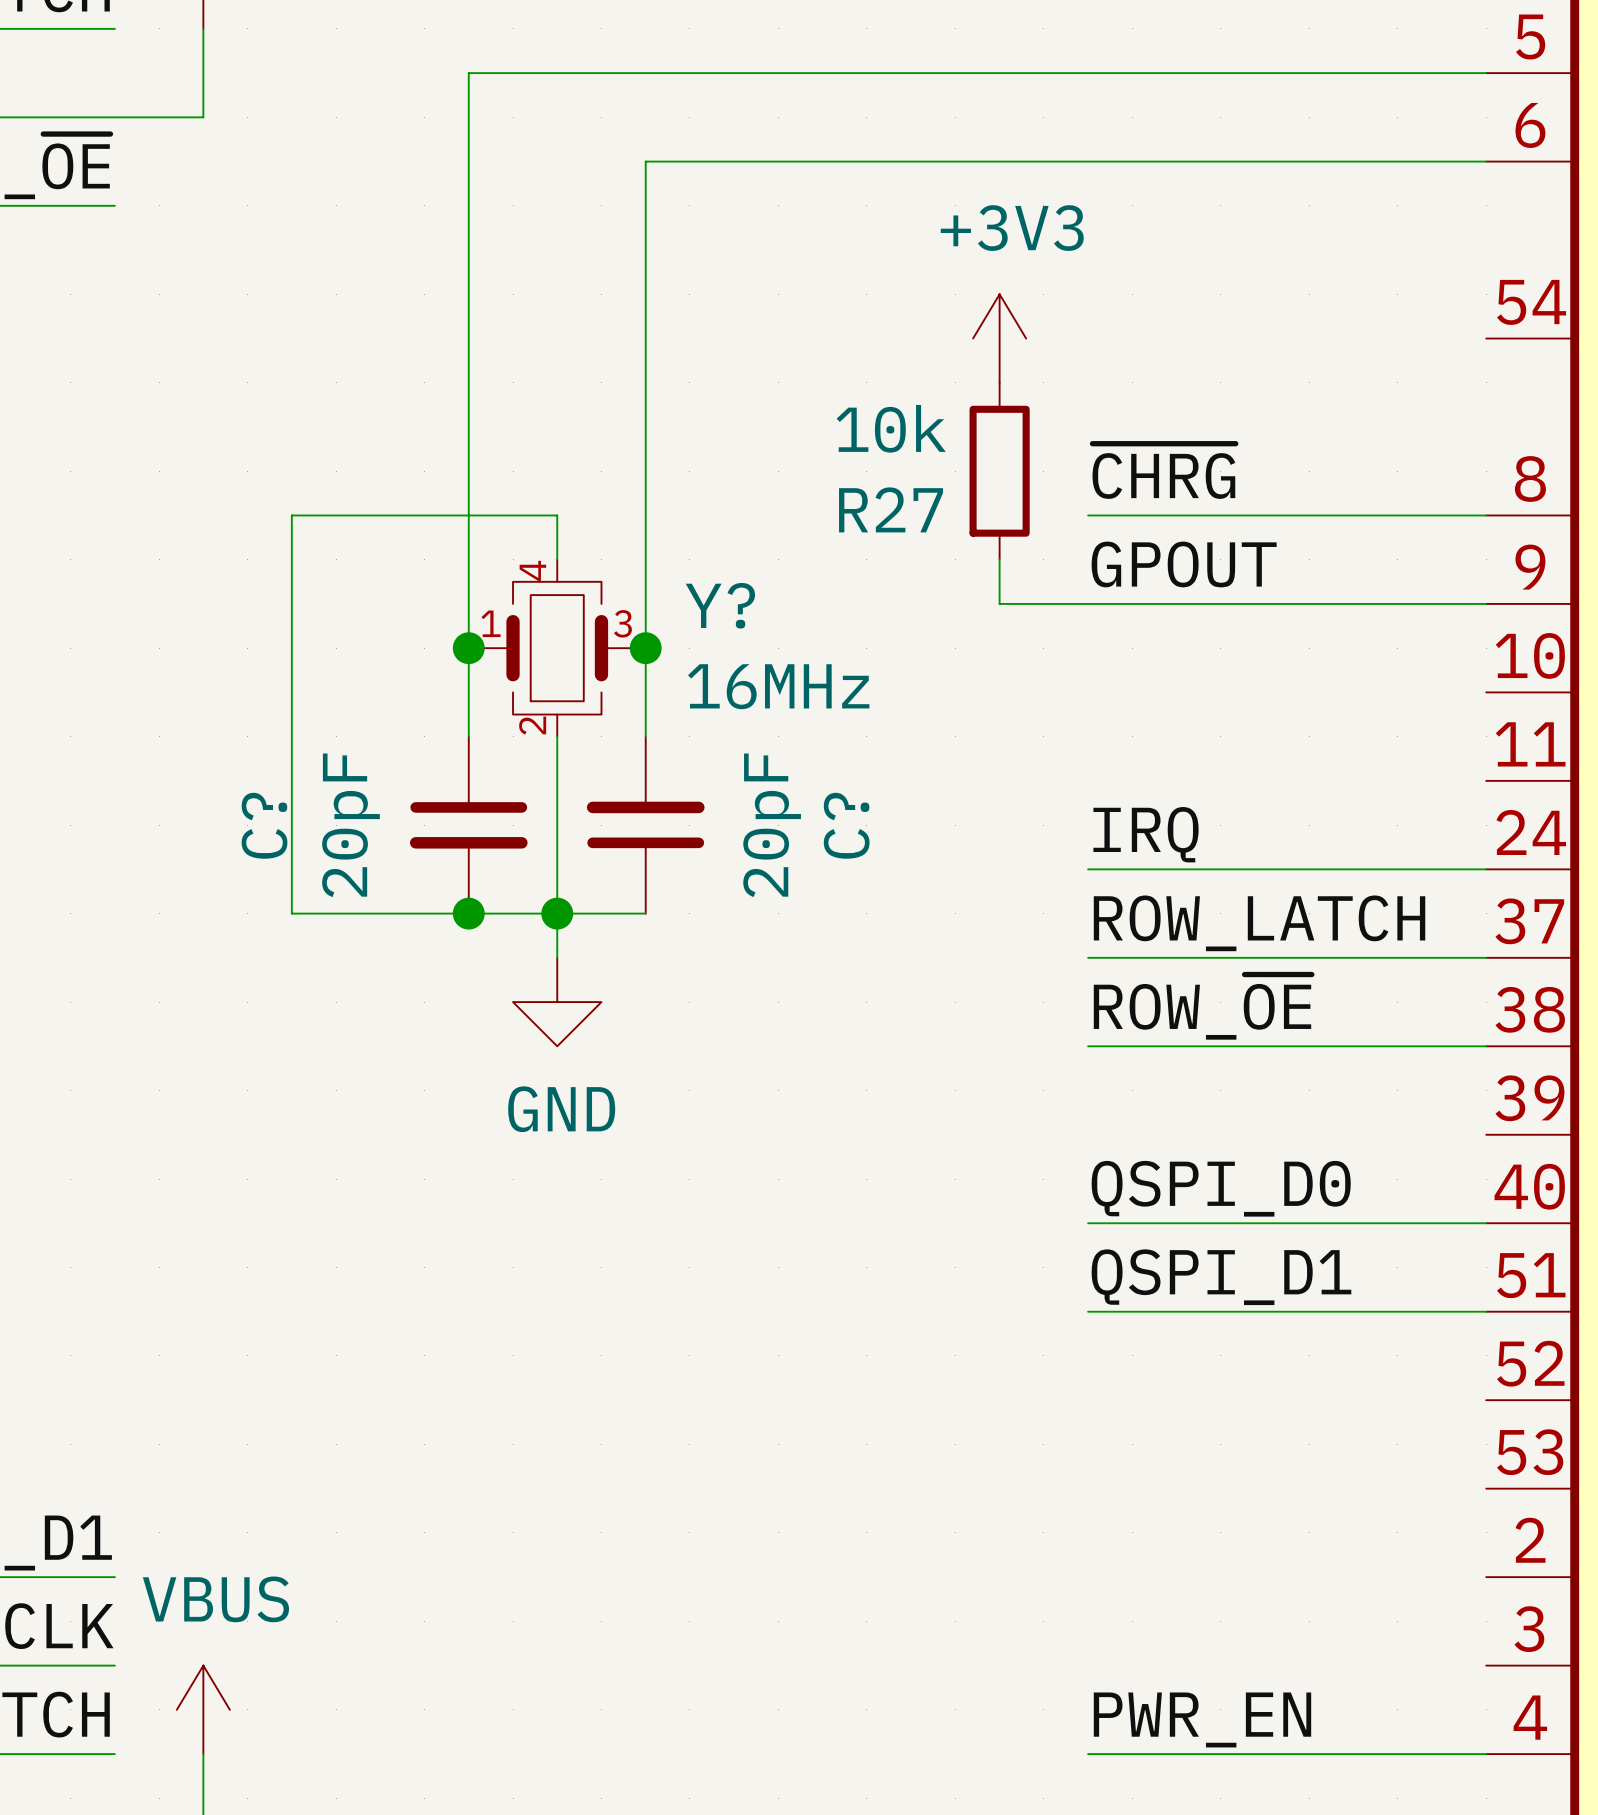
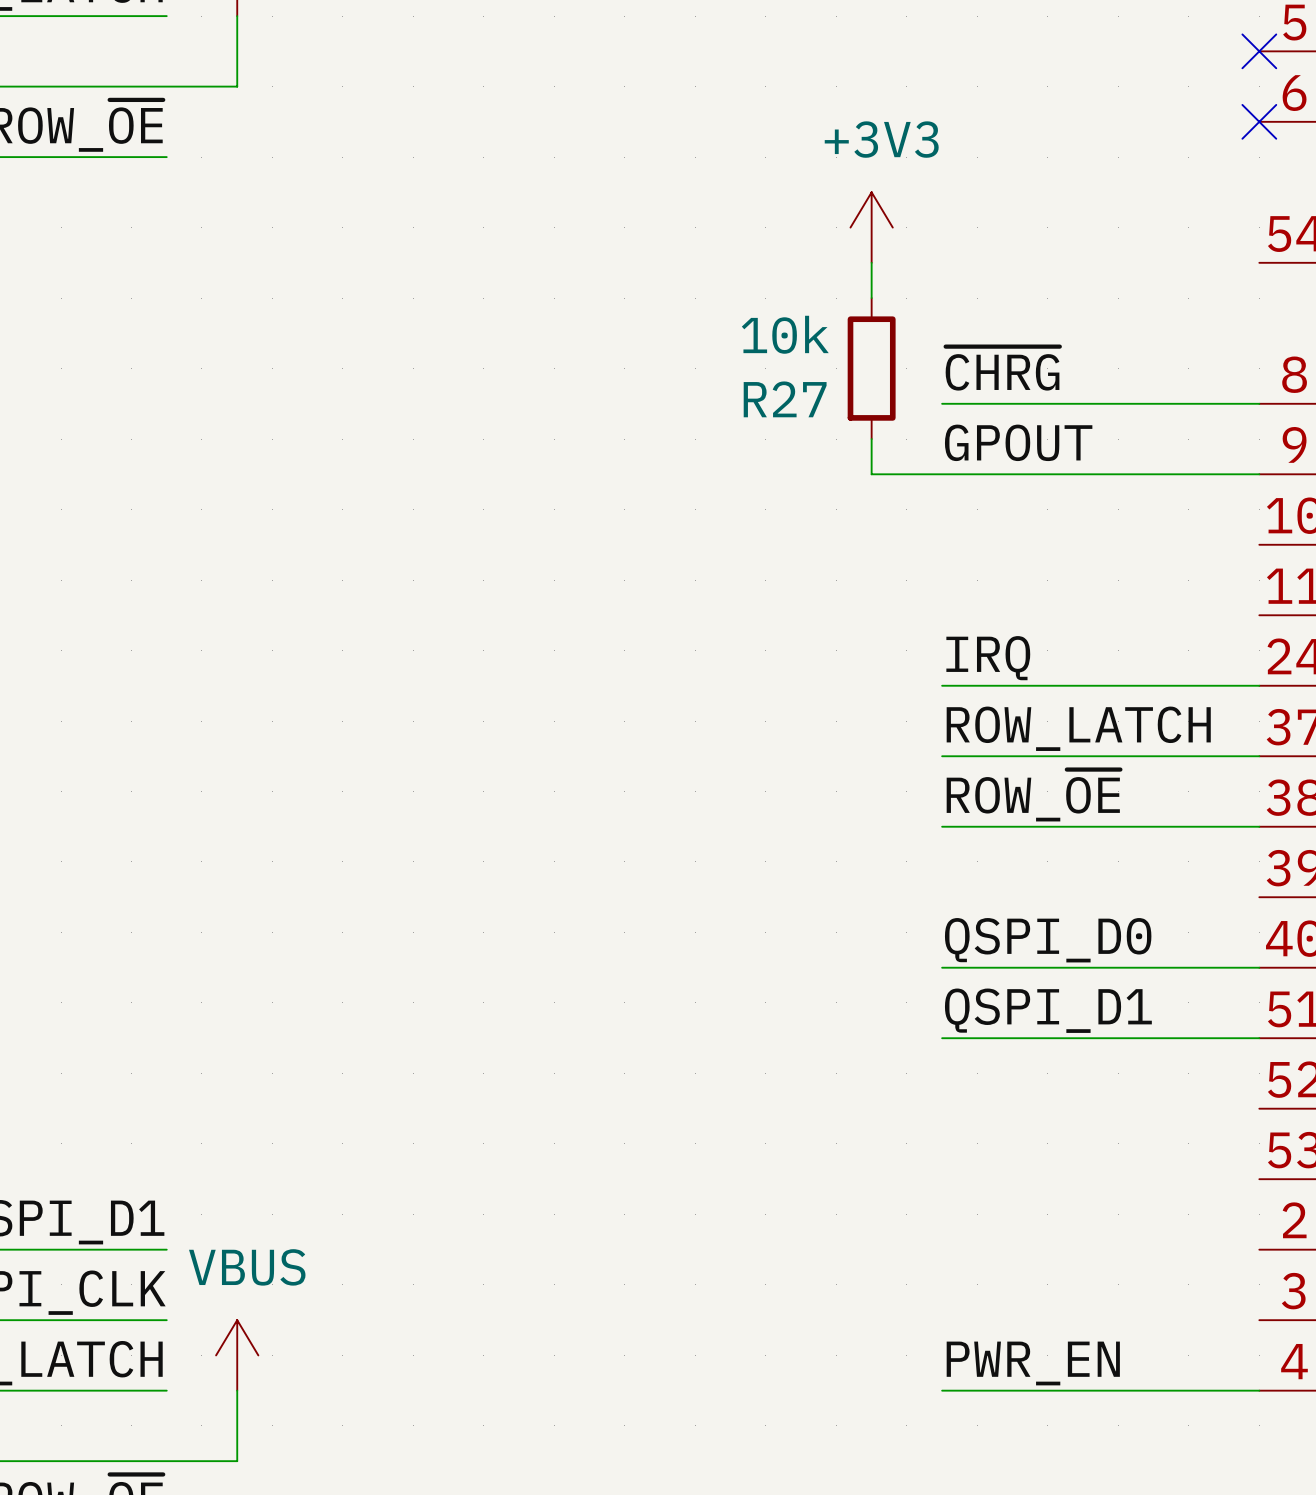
wire: (1486, 73) (468, 73) (468, 736) -> none
no-connect mark: none -> (1259, 51)
wire: (1486, 161) (645, 161) (645, 736) -> none
no-connect mark: none -> (1259, 121)
power symbol position: +3V3 (999, 338) -> +3V3 (871, 227)
wire: (557, 559) (557, 515) (291, 515) (291, 913) (645, 913) -> none
junction: (468, 648) -> none
Y?: 16MHz (557, 648) -> none
junction: (645, 648) -> none
wire: (557, 736) (557, 957) -> none
C?: 20pF (468, 825) -> none
C?: 20pF (645, 825) -> none
junction: (468, 913) -> none
junction: (557, 913) -> none
power symbol: GND (557, 1002) -> none

